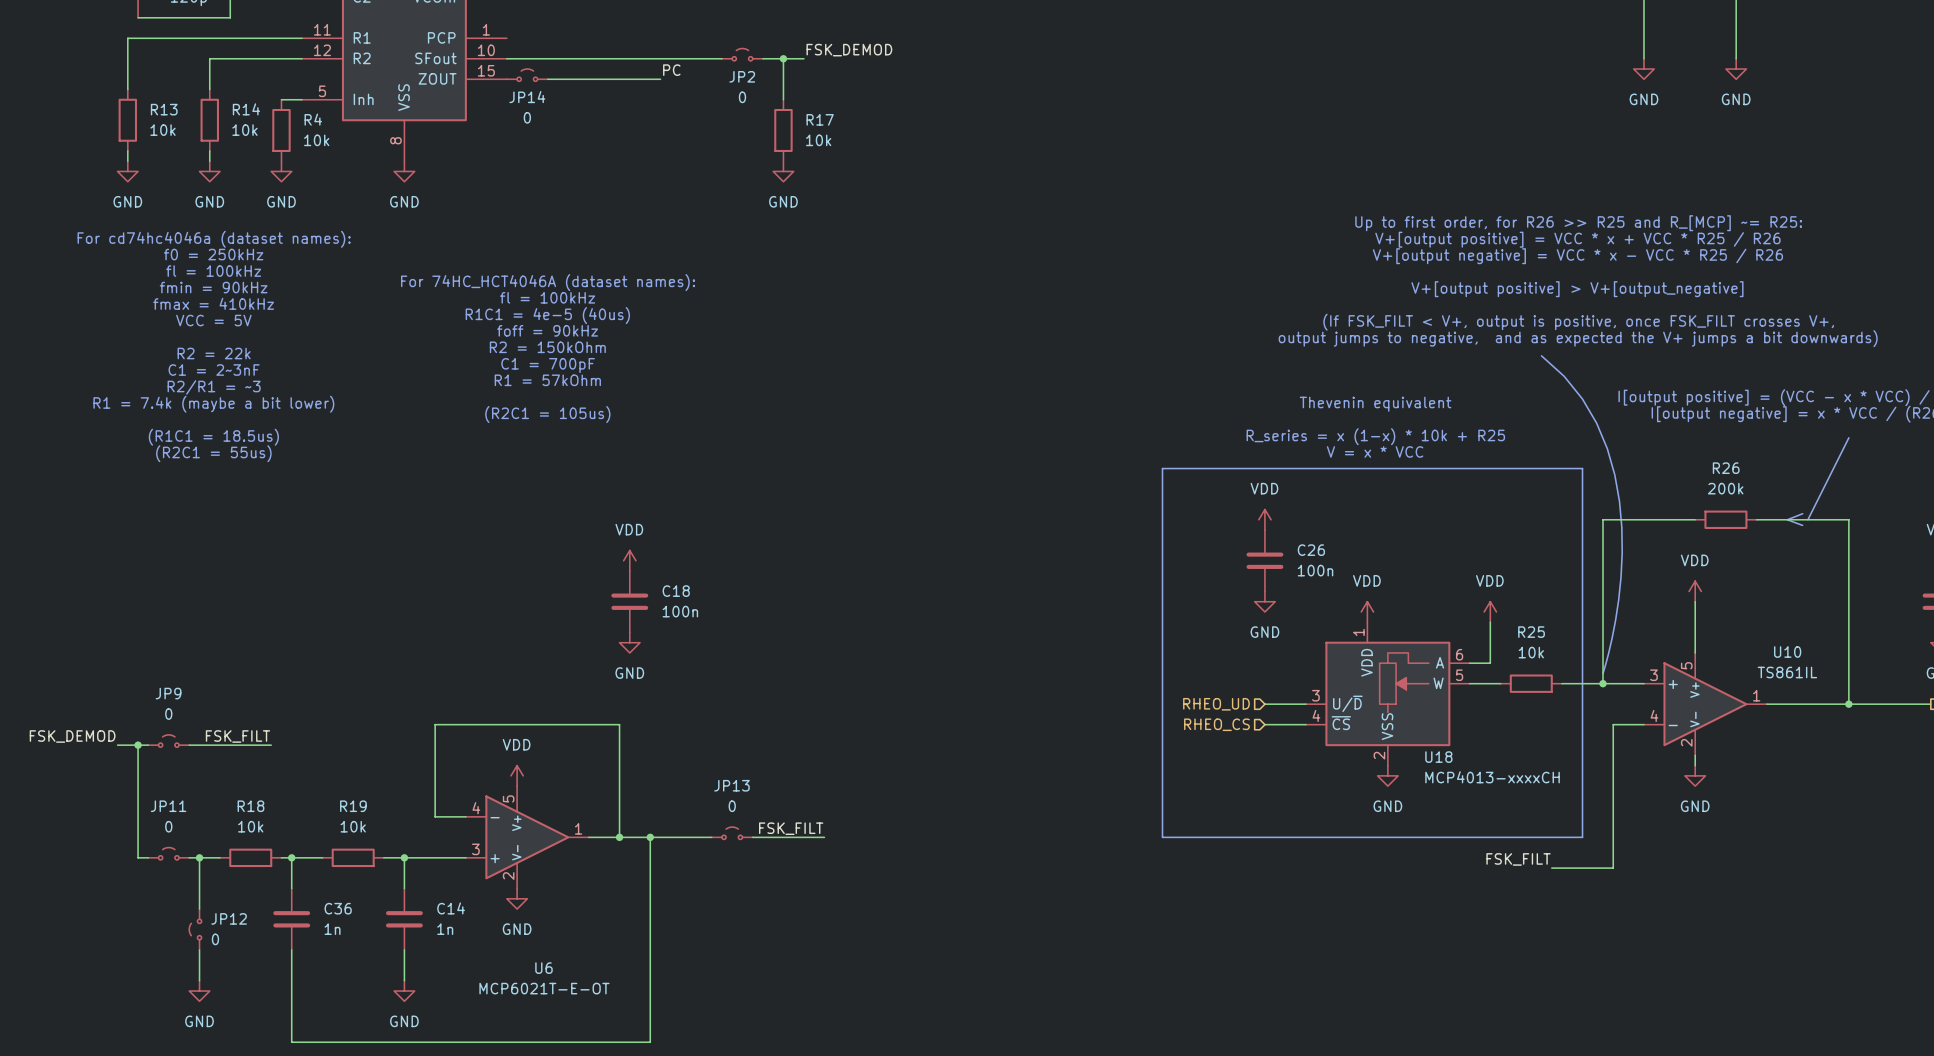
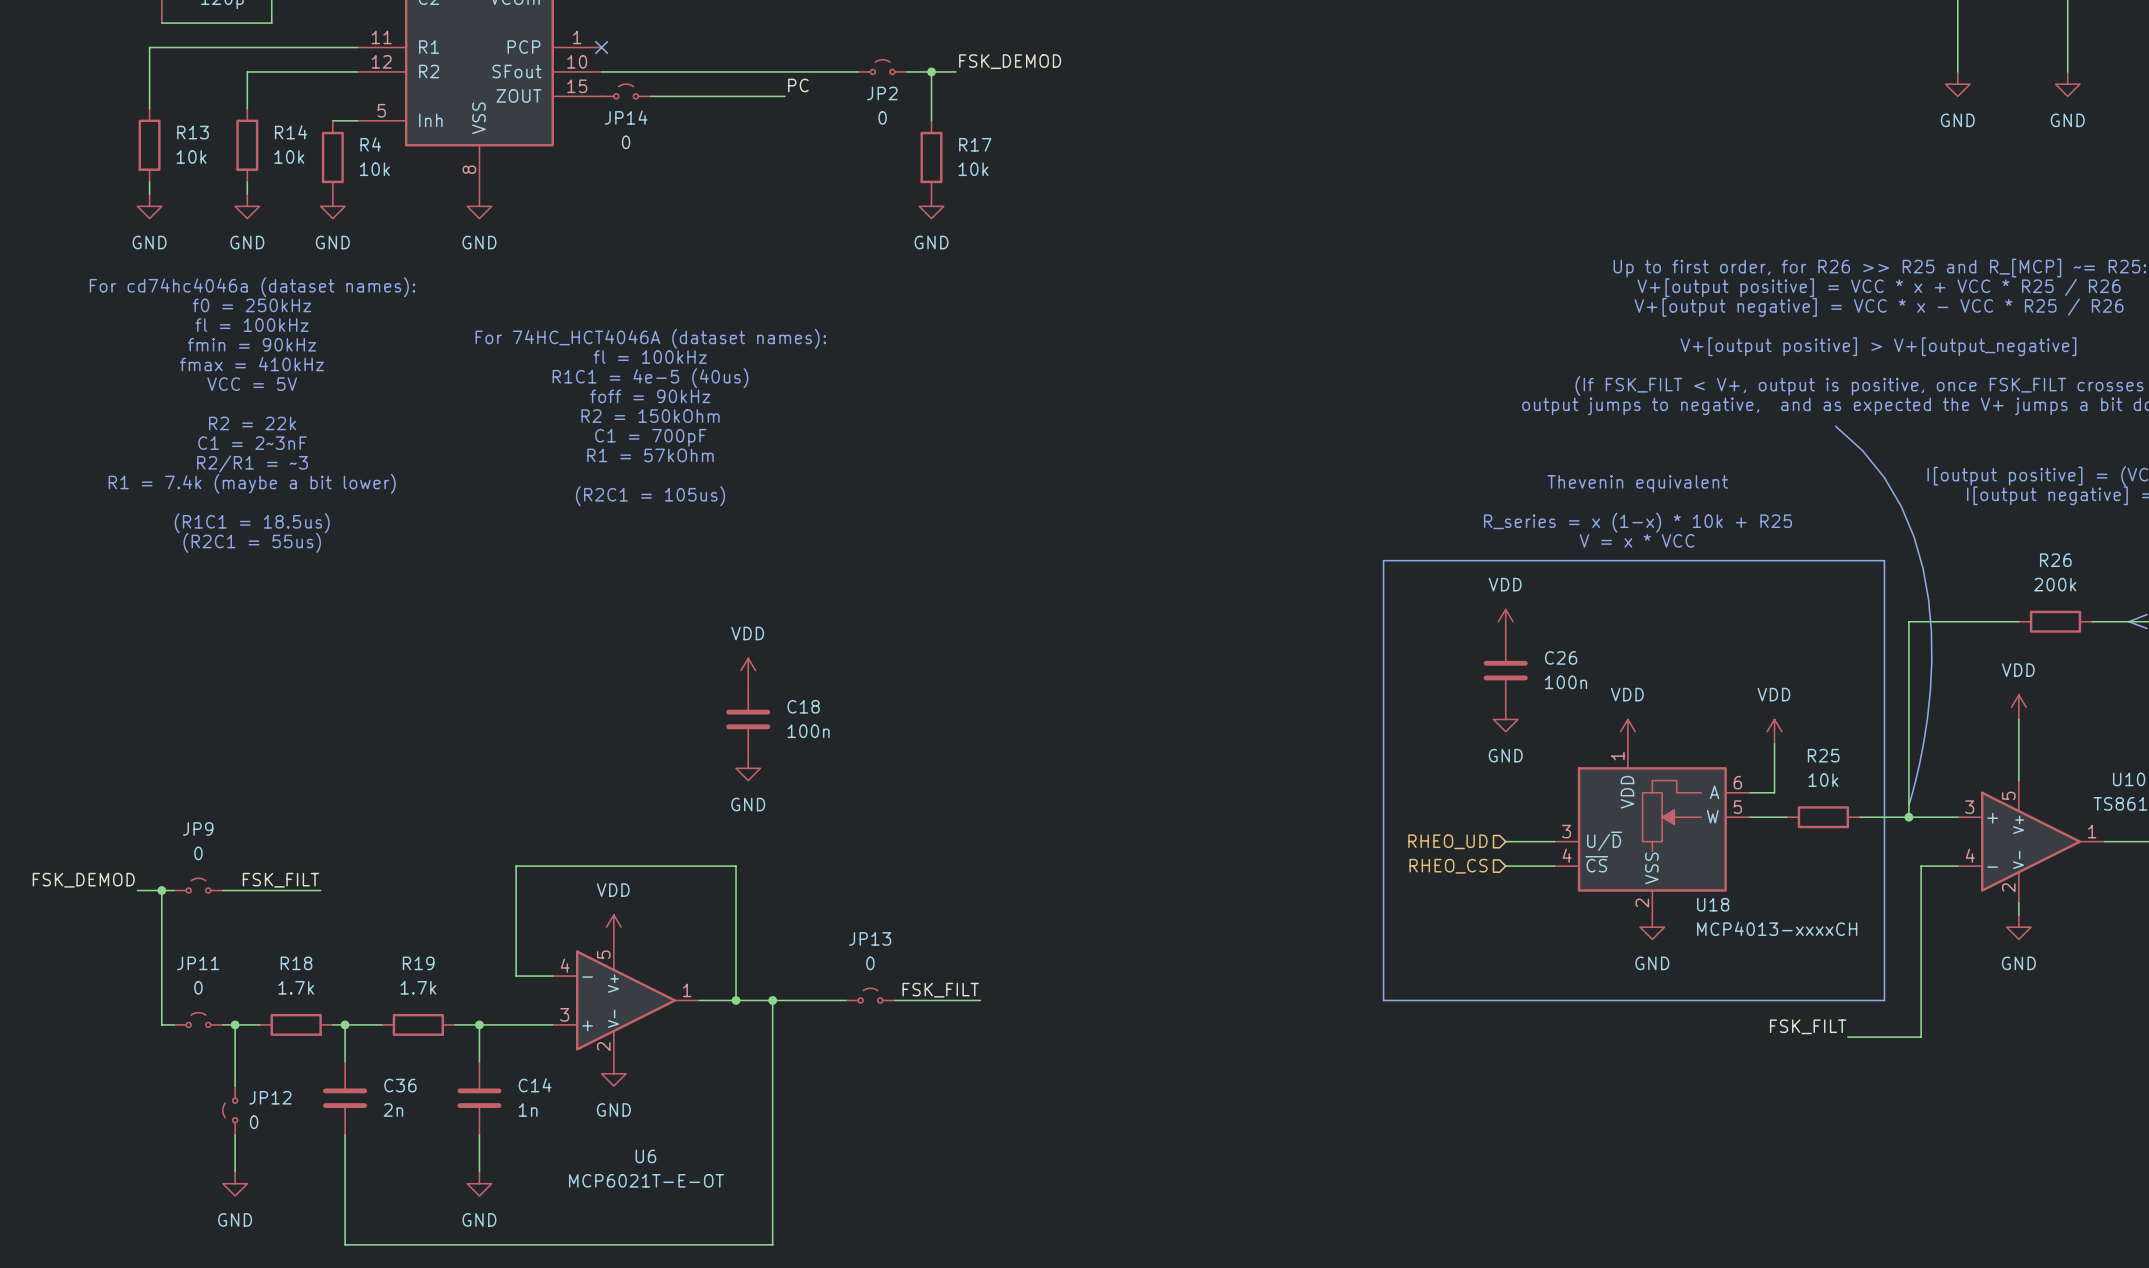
no-connect mark: none -> (601, 47)
R18 value: 10k (250, 826) -> 1.7k (296, 987)
R19 value: 10k (353, 826) -> 1.7k (418, 987)
C36 value: 1n (332, 929) -> 2n (393, 1109)

